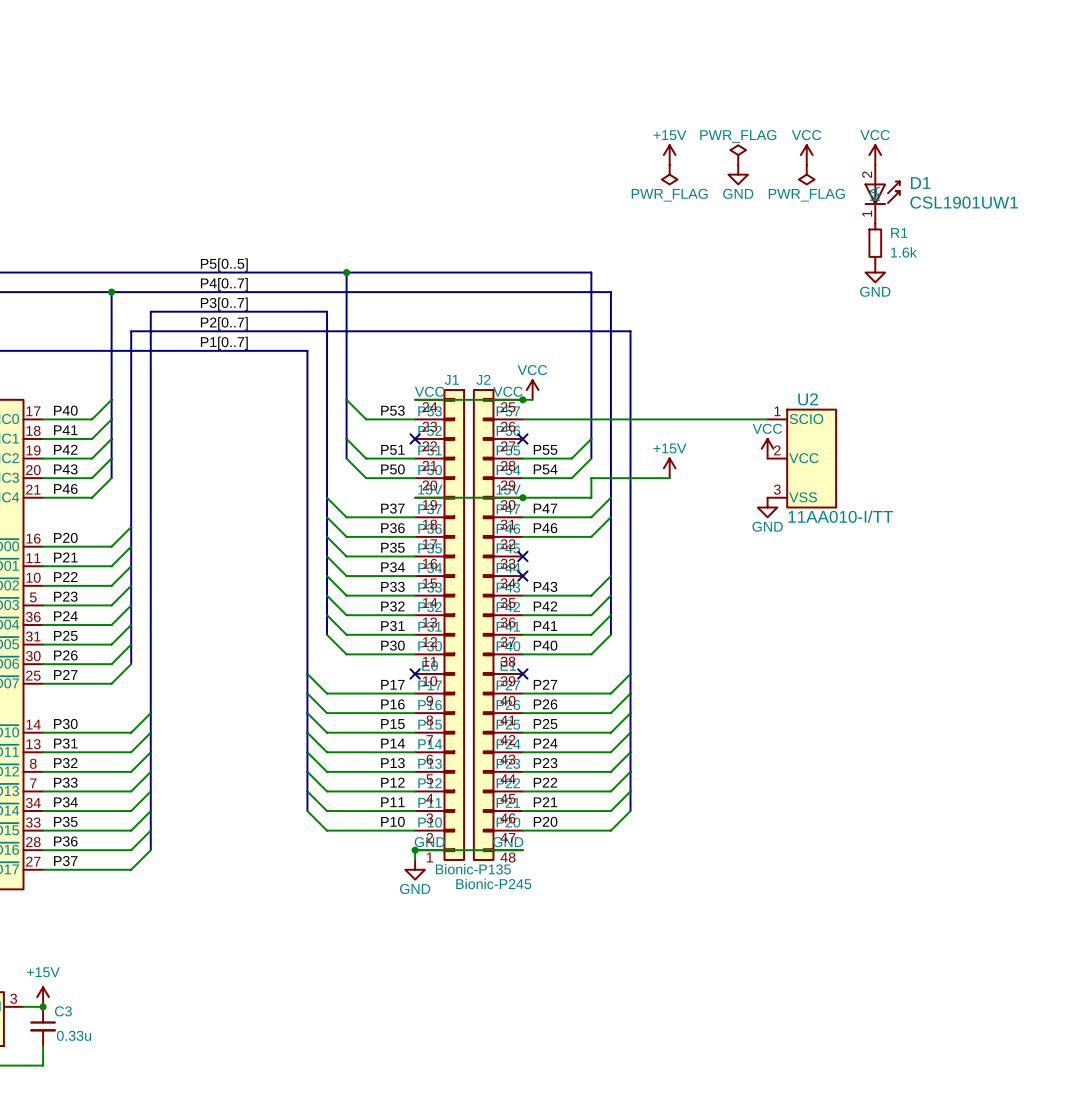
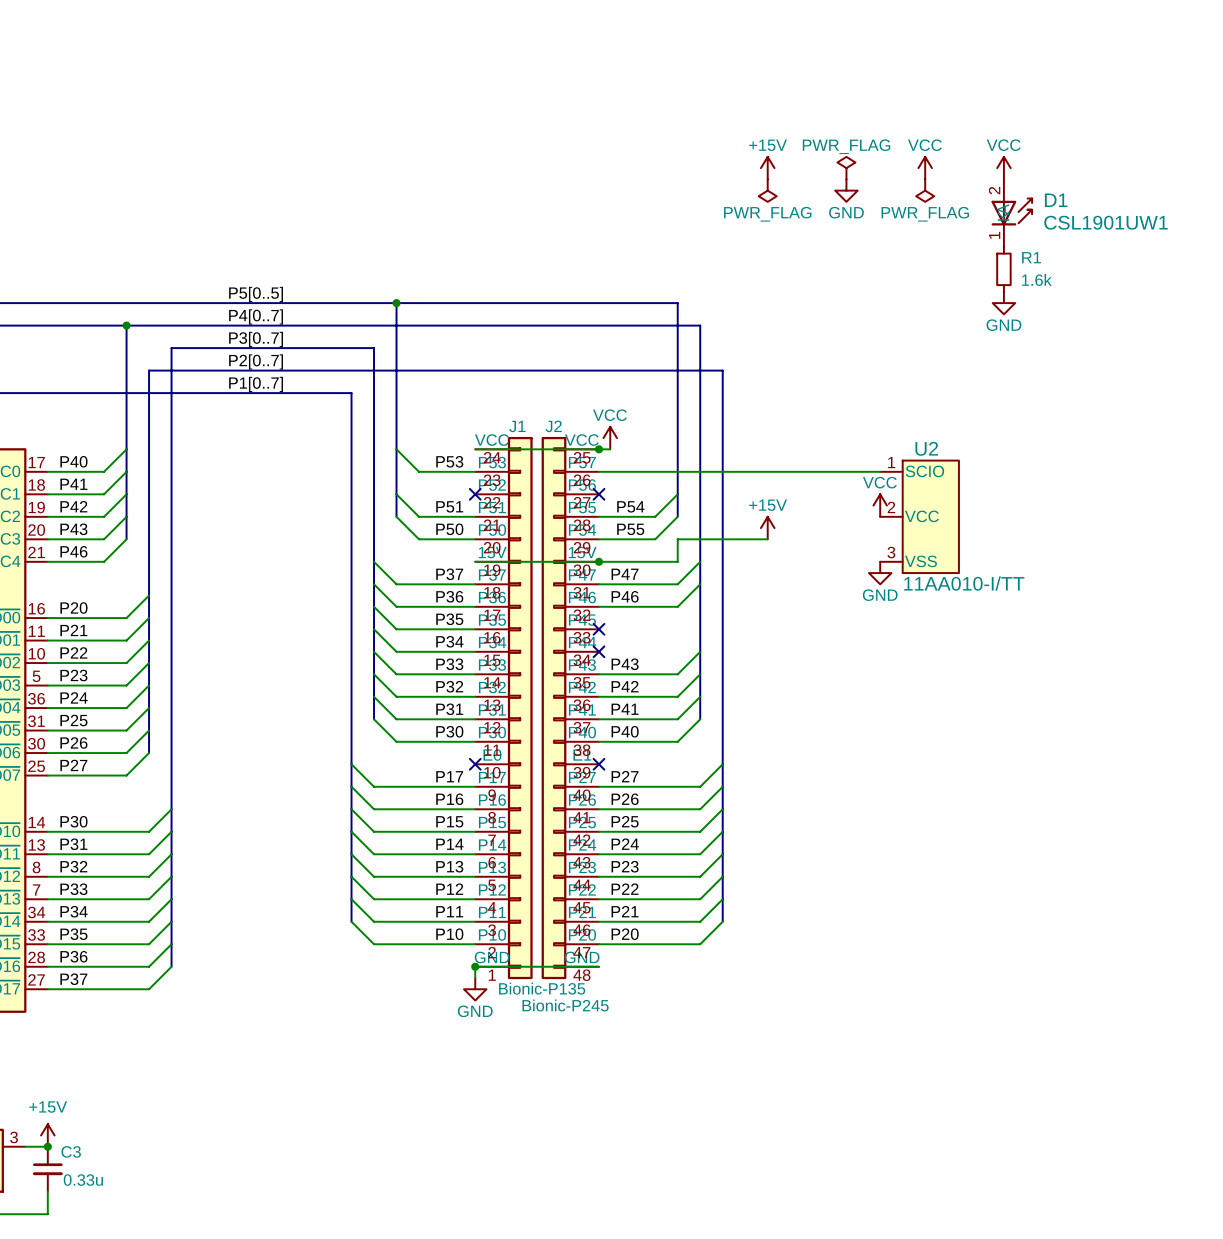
label: P55 (545, 449) -> P54 (630, 506)
label: P54 (545, 469) -> P55 (630, 529)

